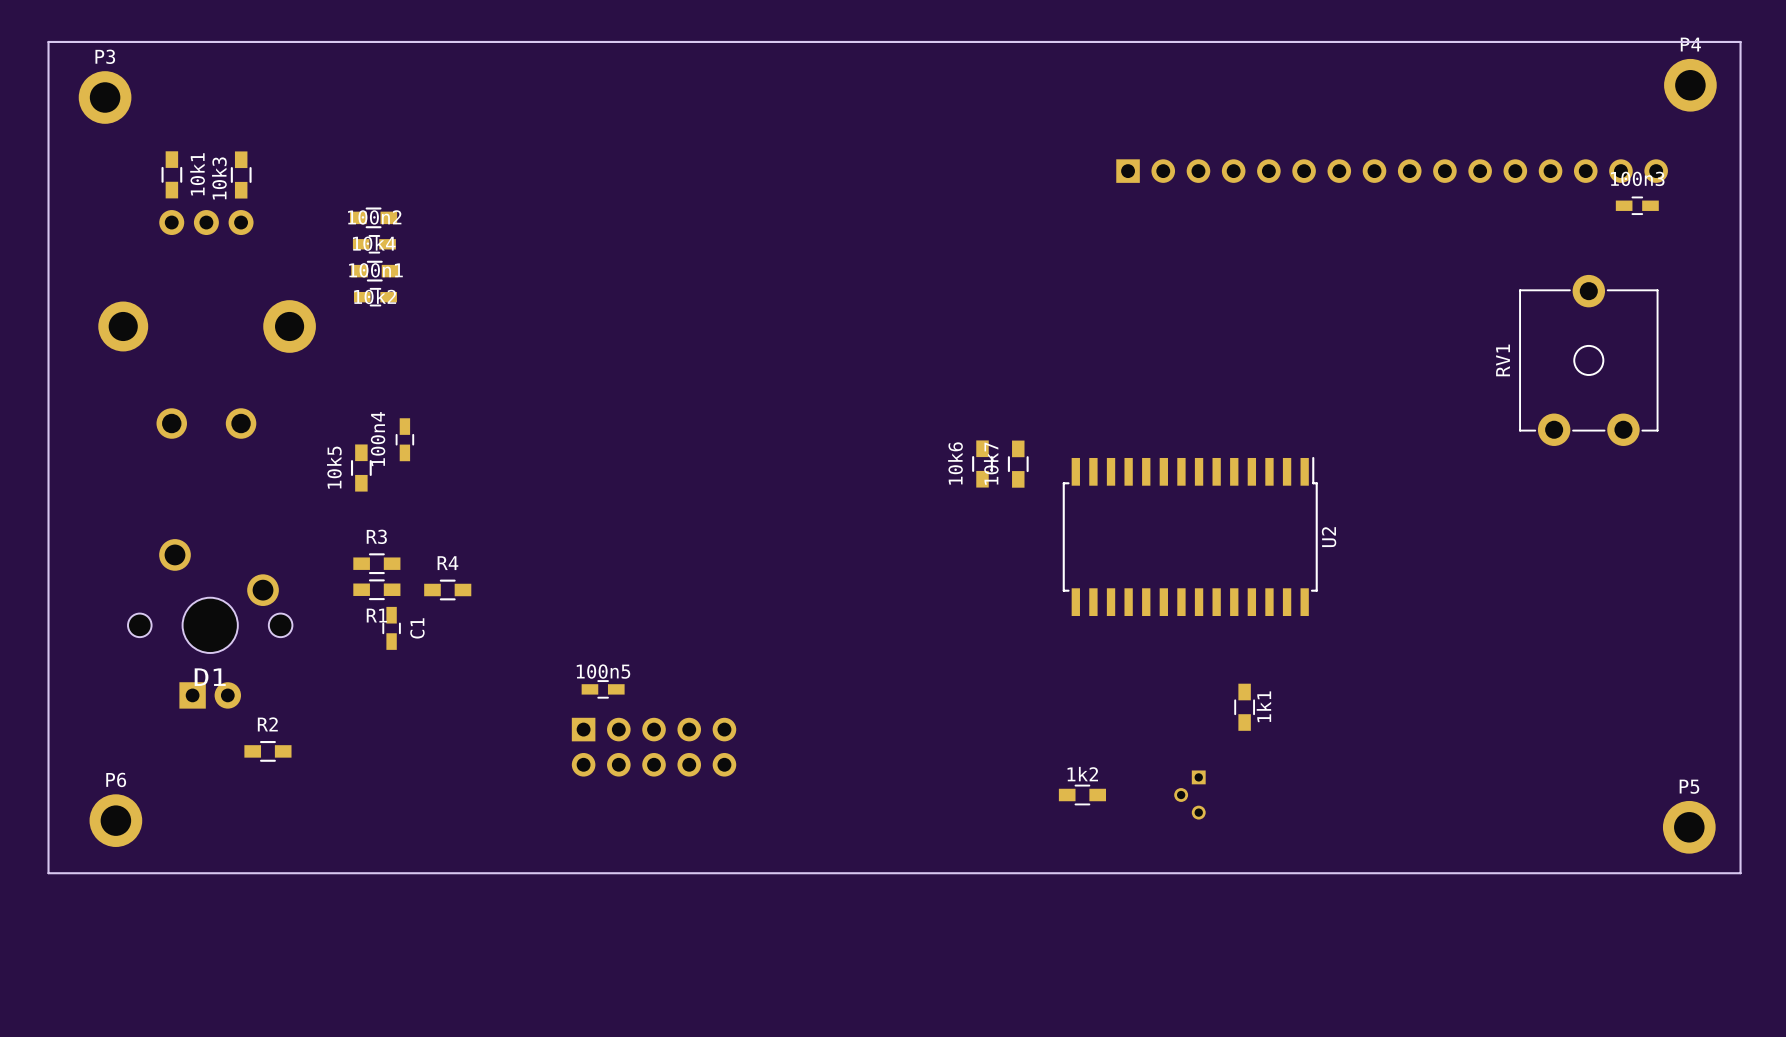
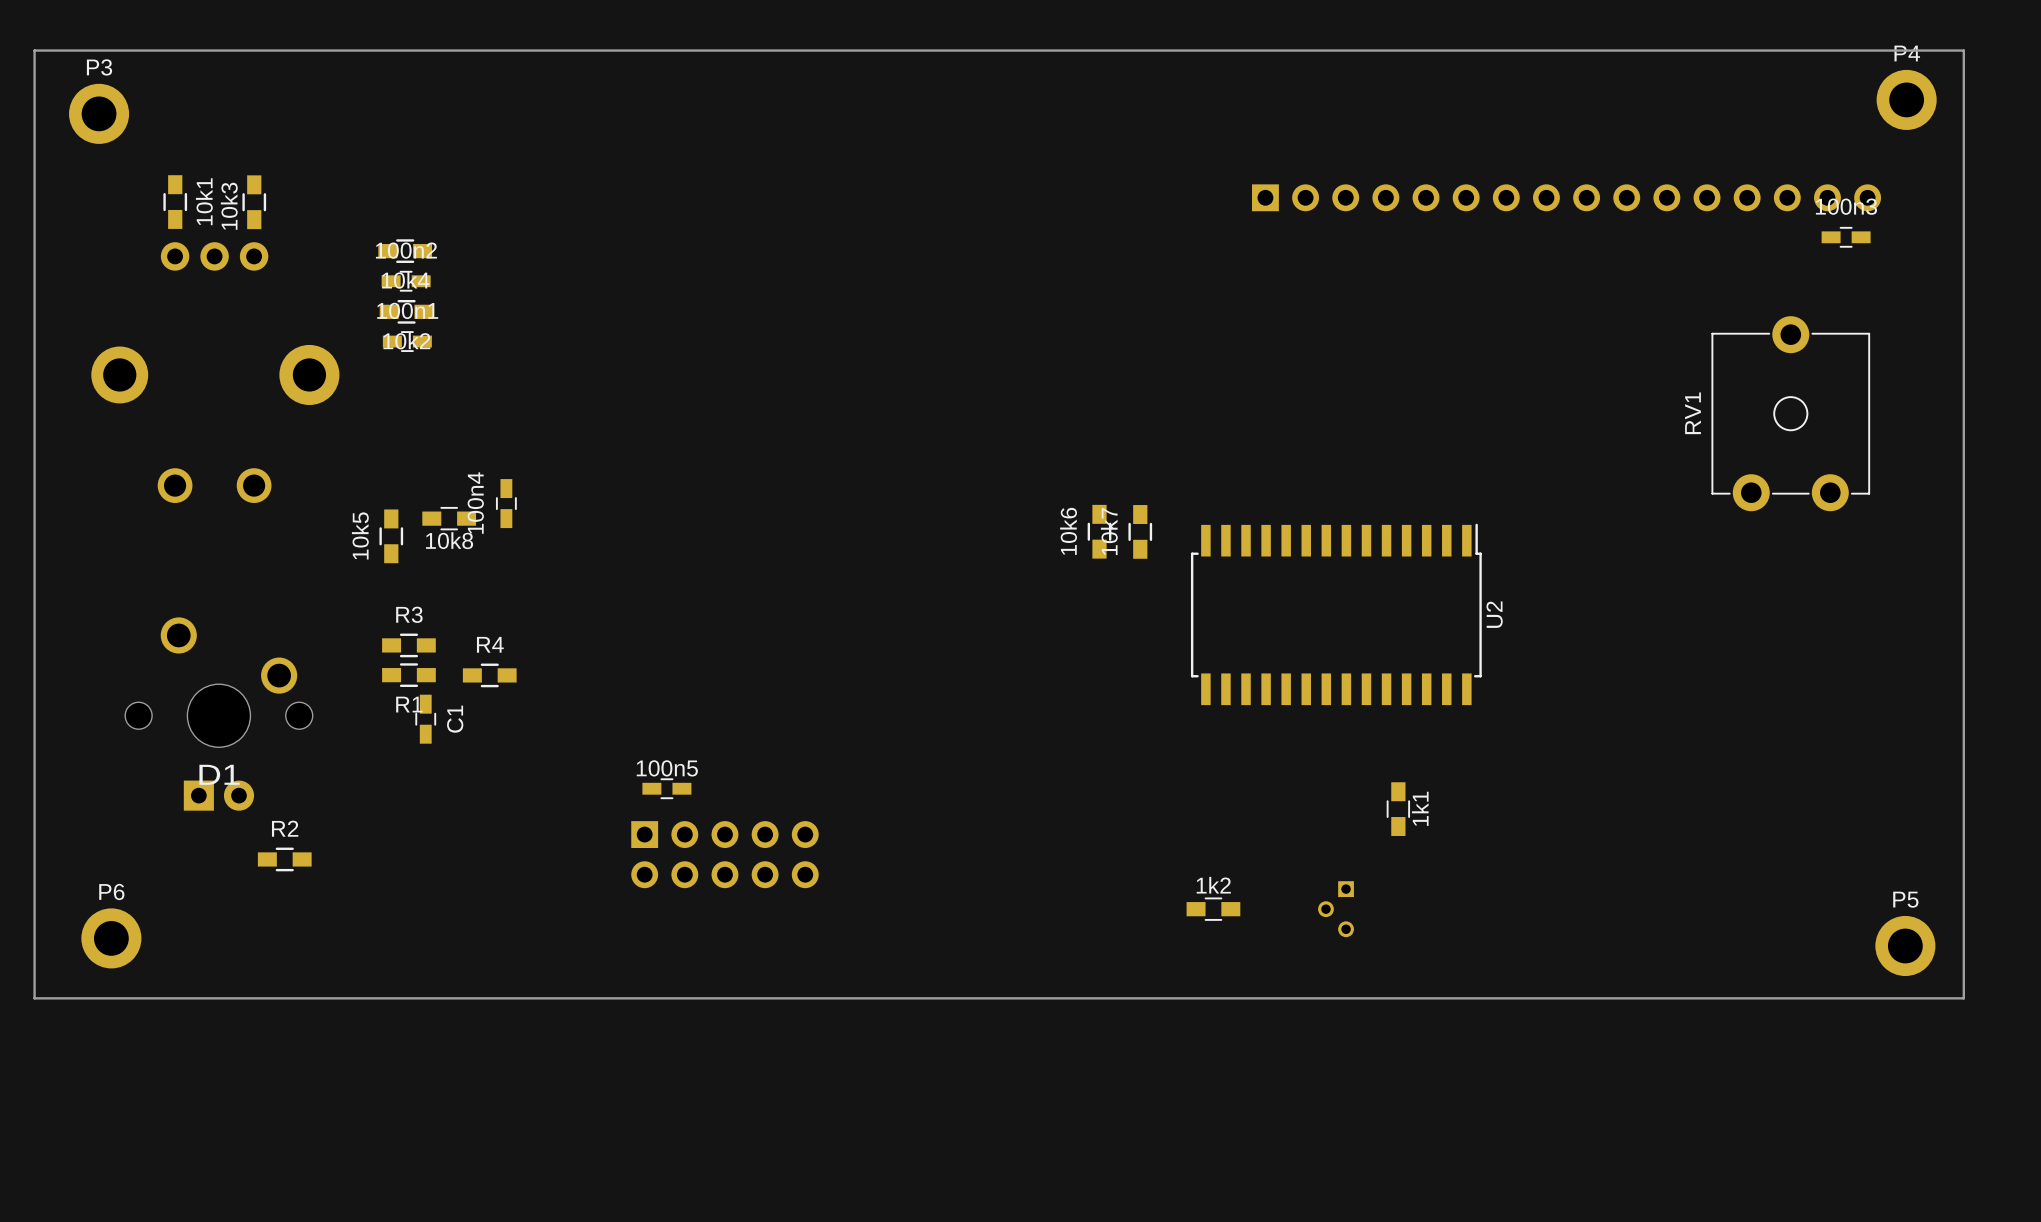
100n4 position: (404, 439) -> (506, 503)
10k8: none -> (449, 518)

